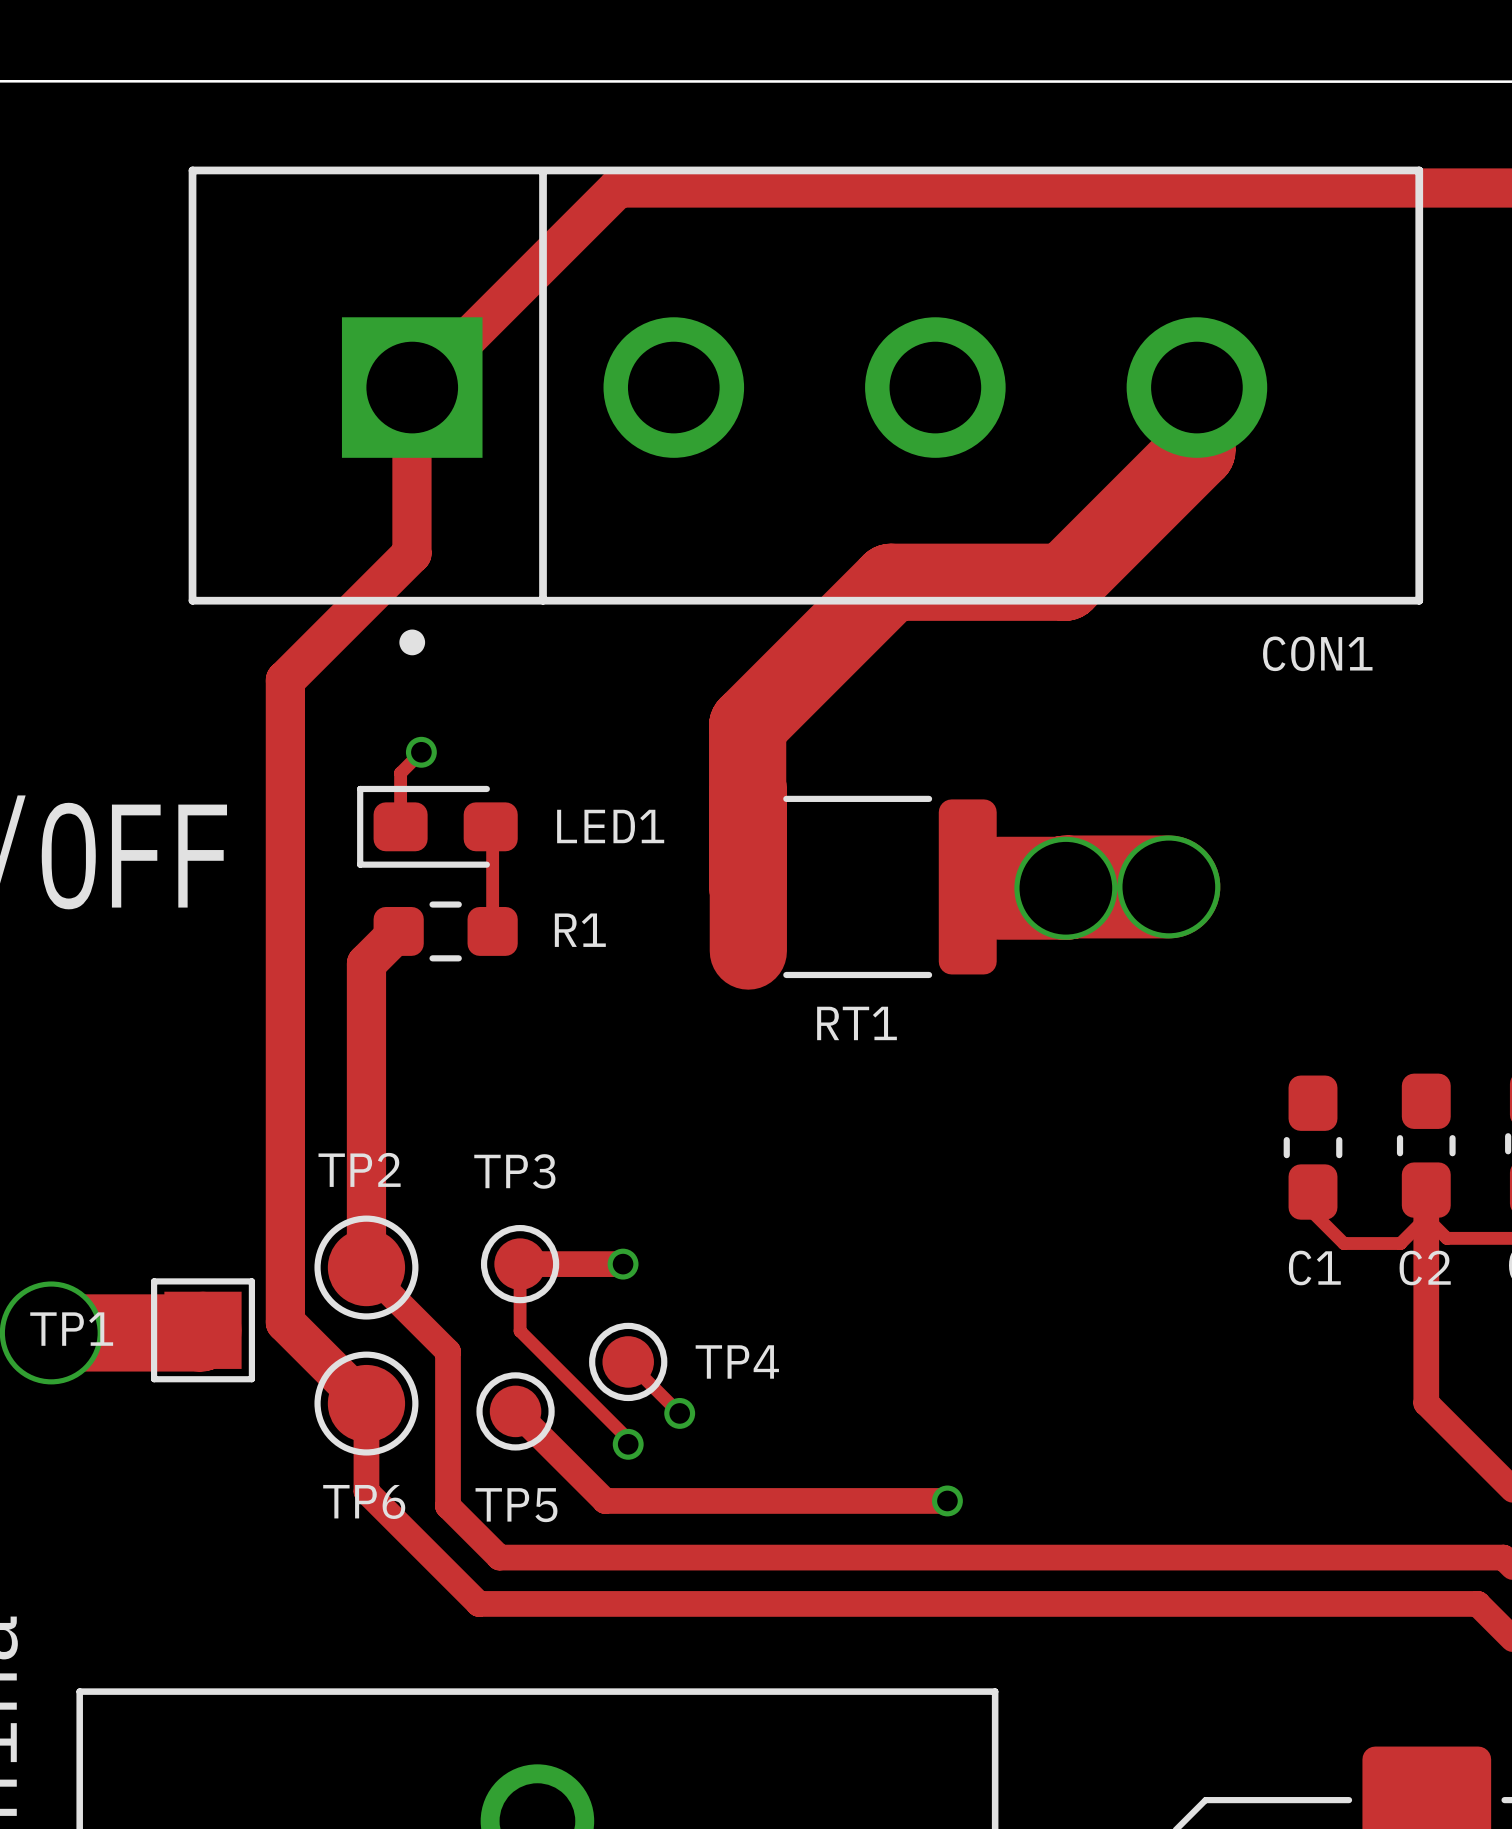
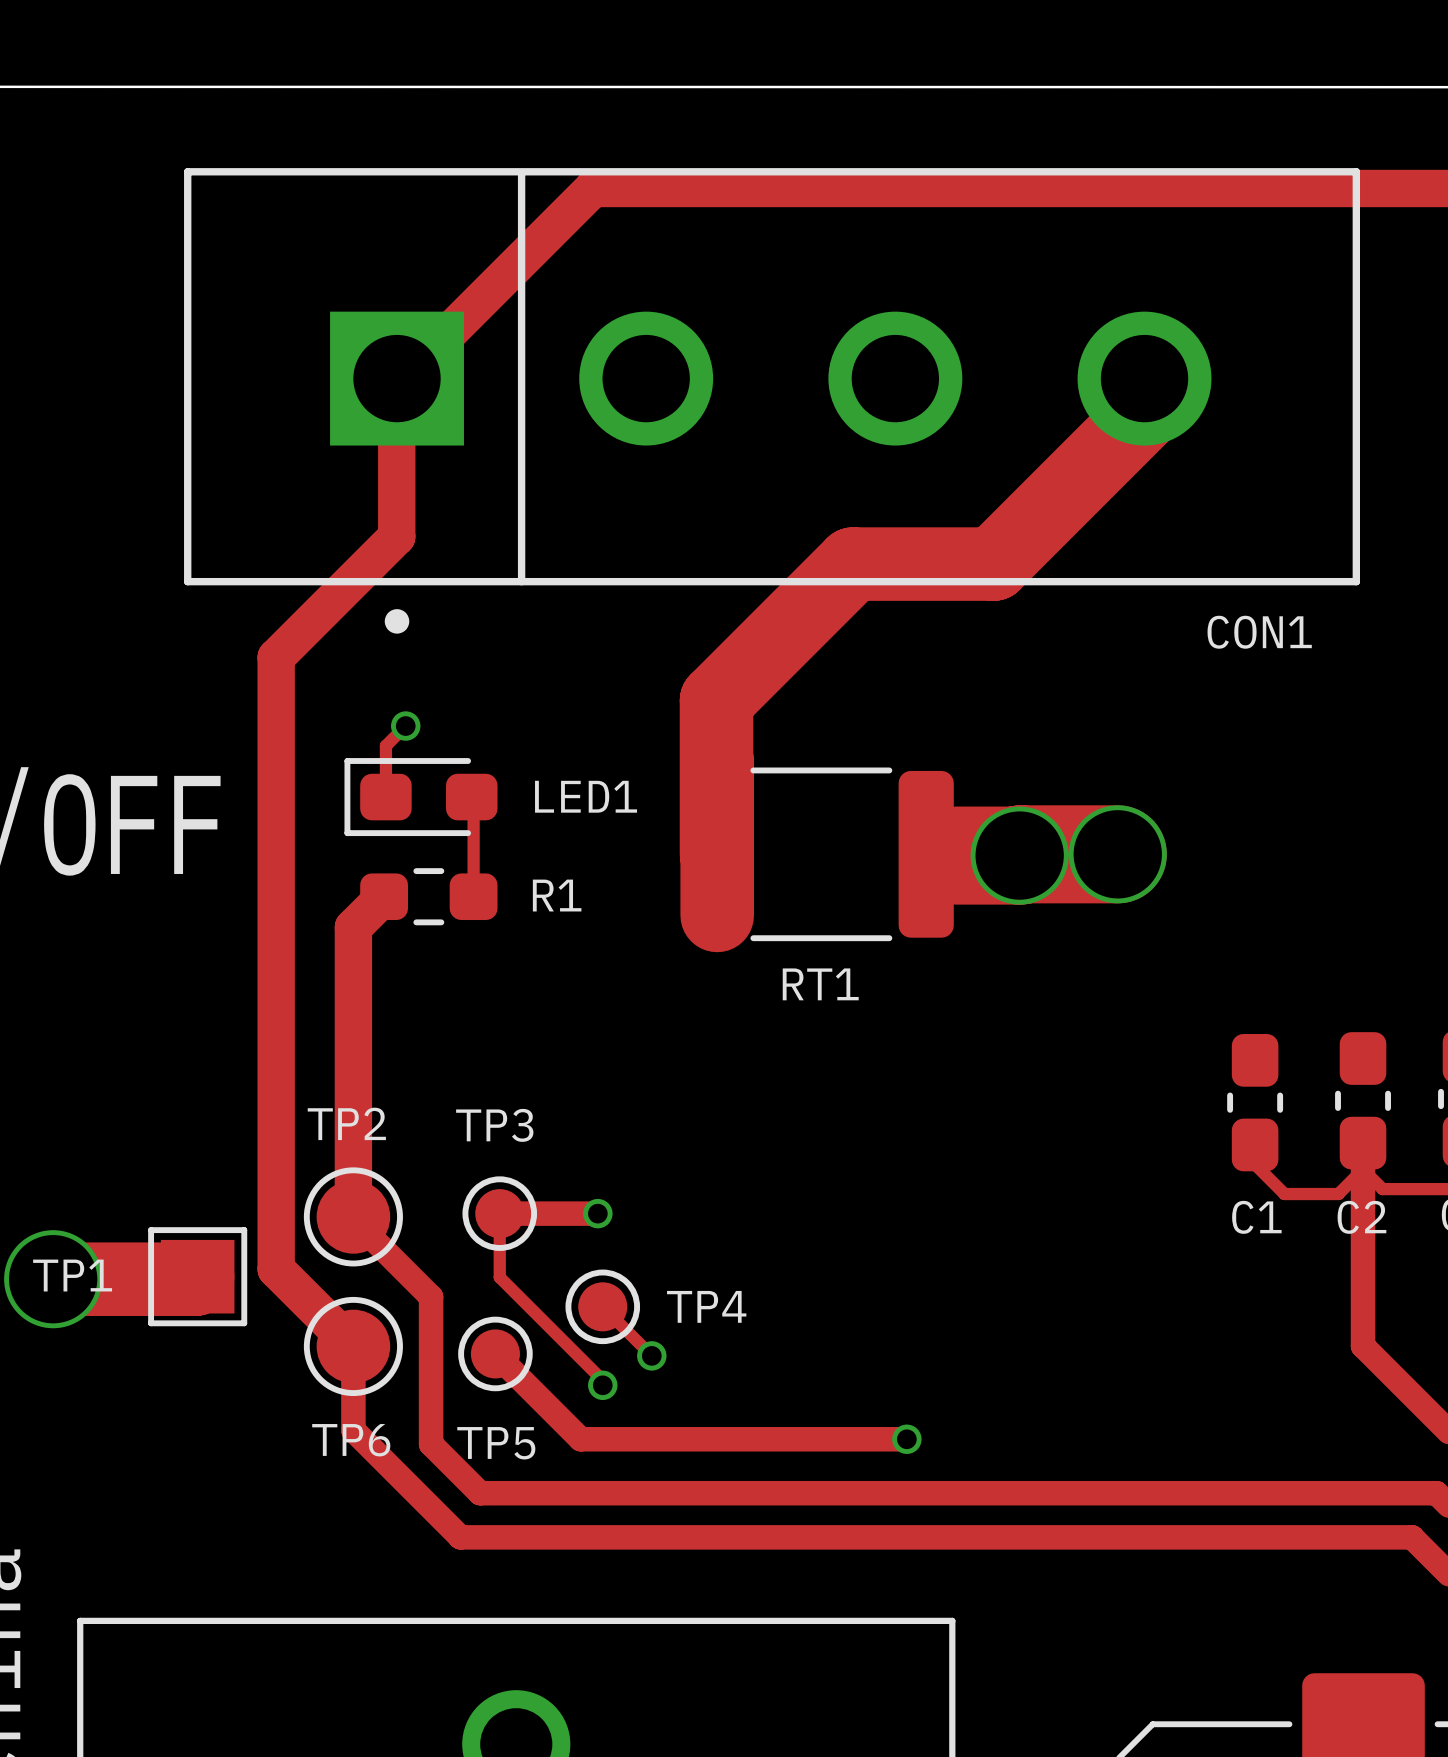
track: (1196, 423) (1196, 450) (1064, 582) (1038, 582) -> (1144, 413) (993, 564)

